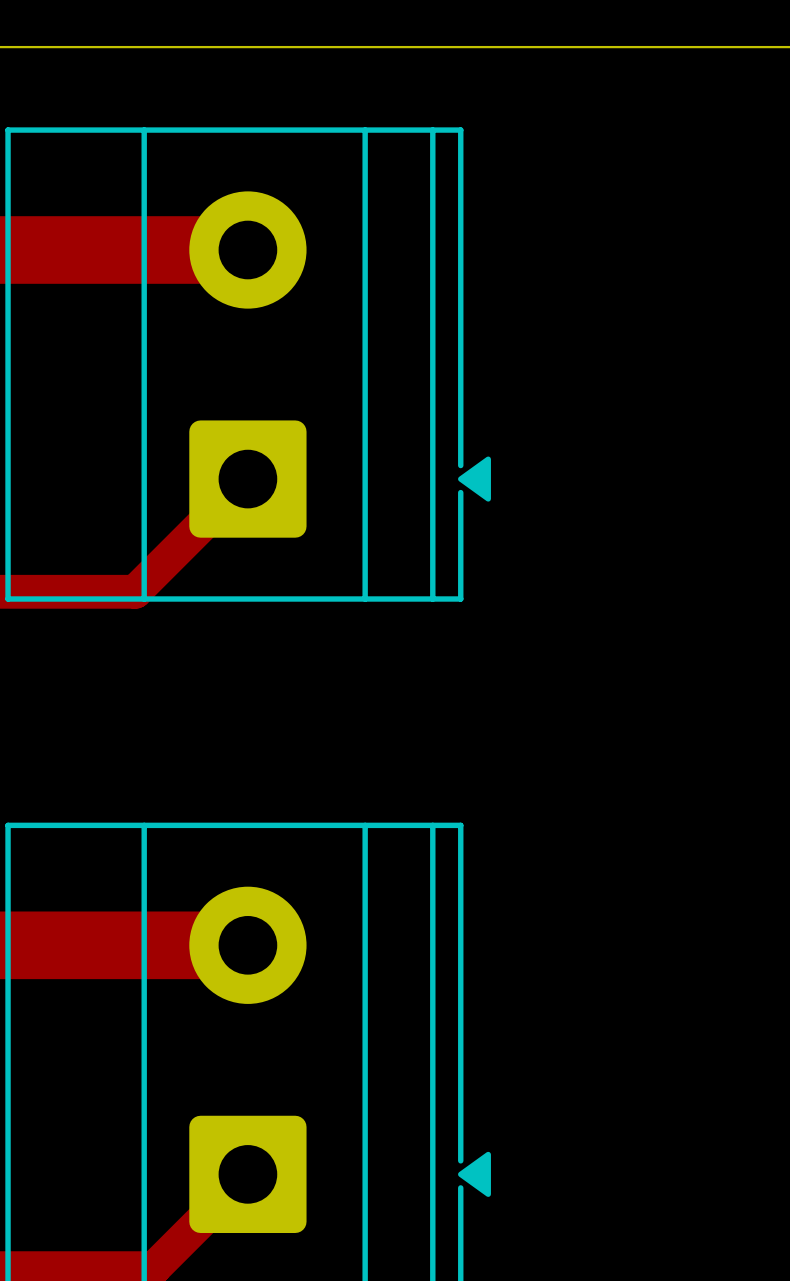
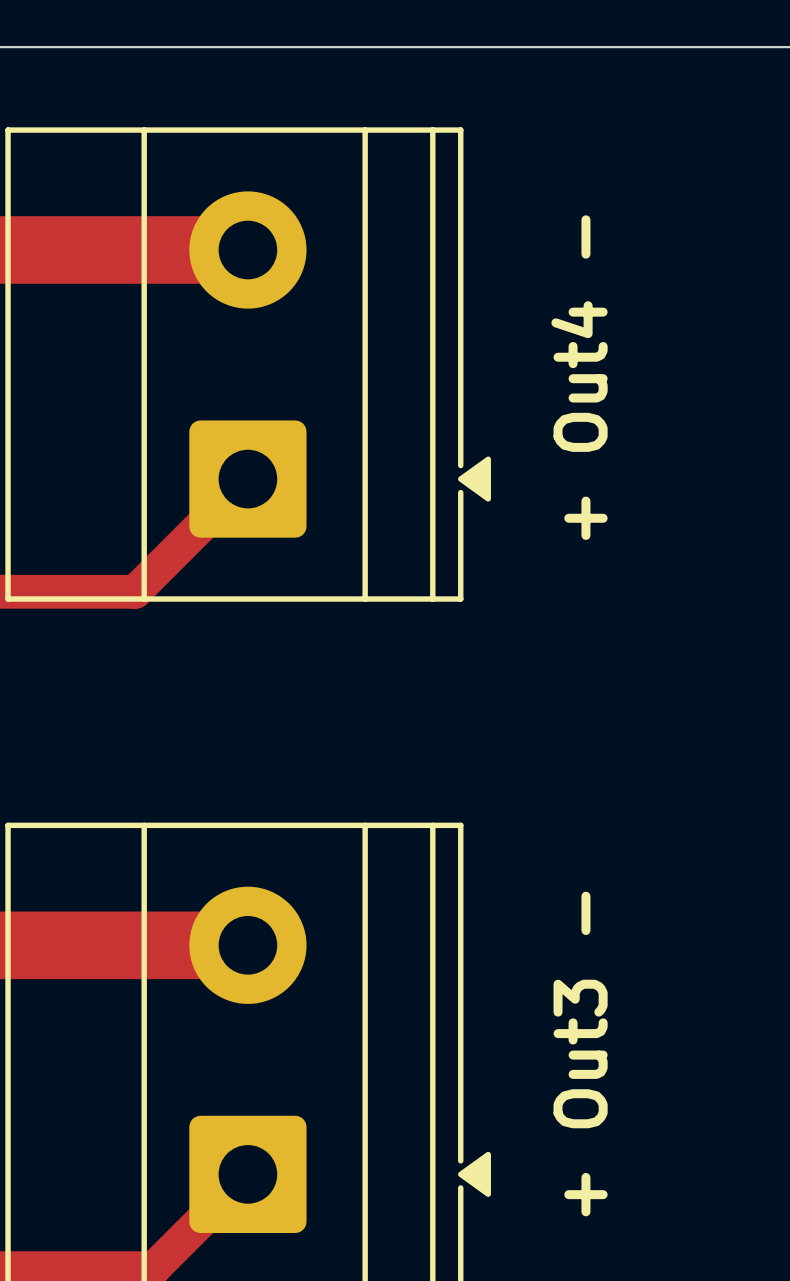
text: none -> + Out4 - (579, 377)
text: none -> + Out3 - (580, 1053)

